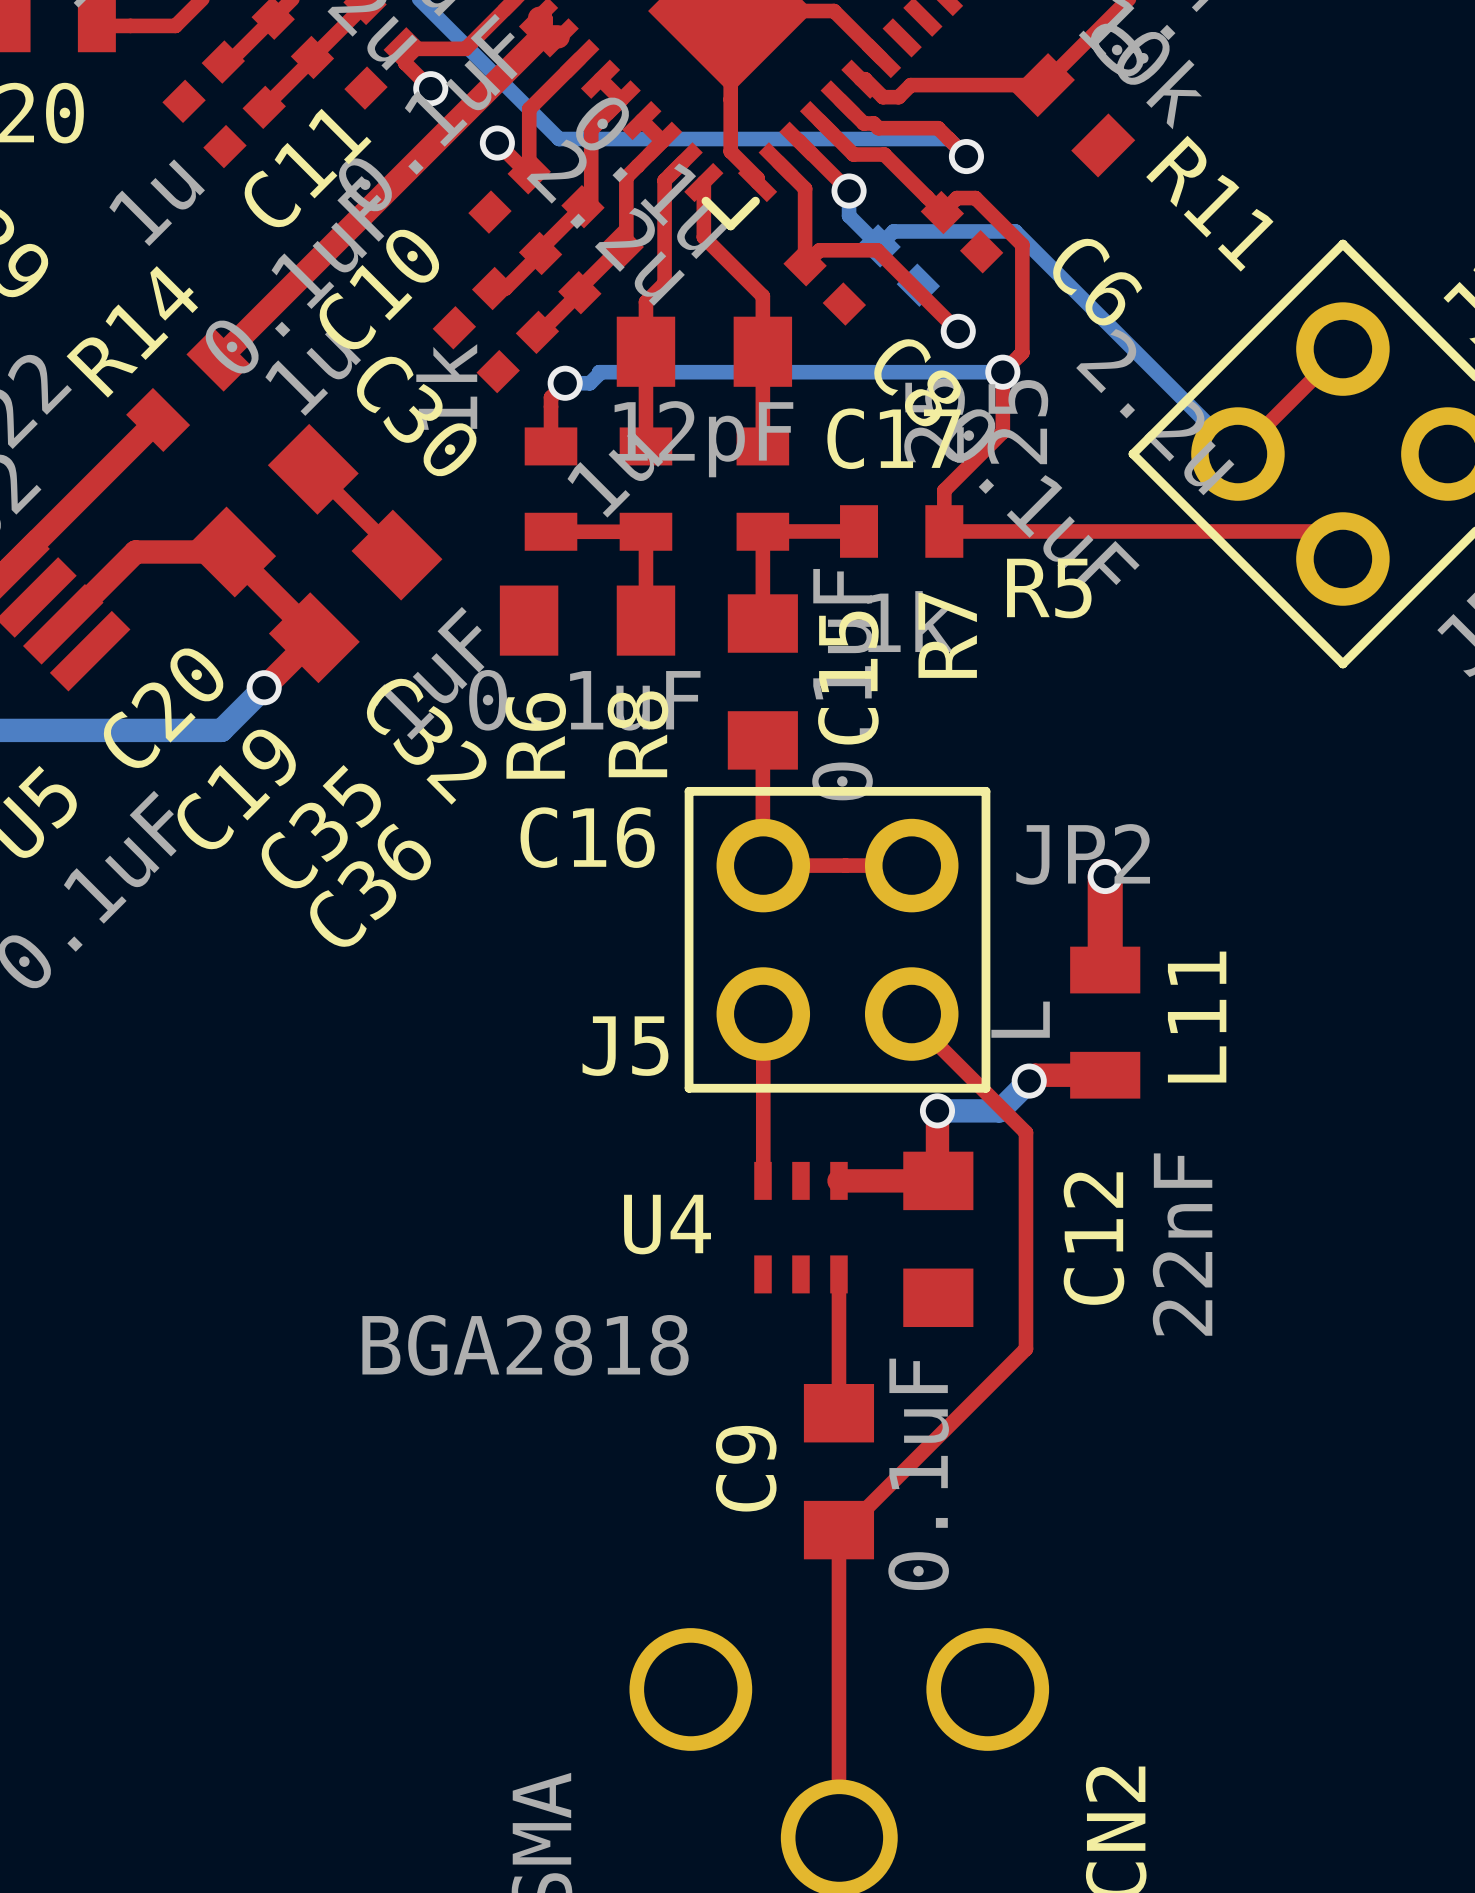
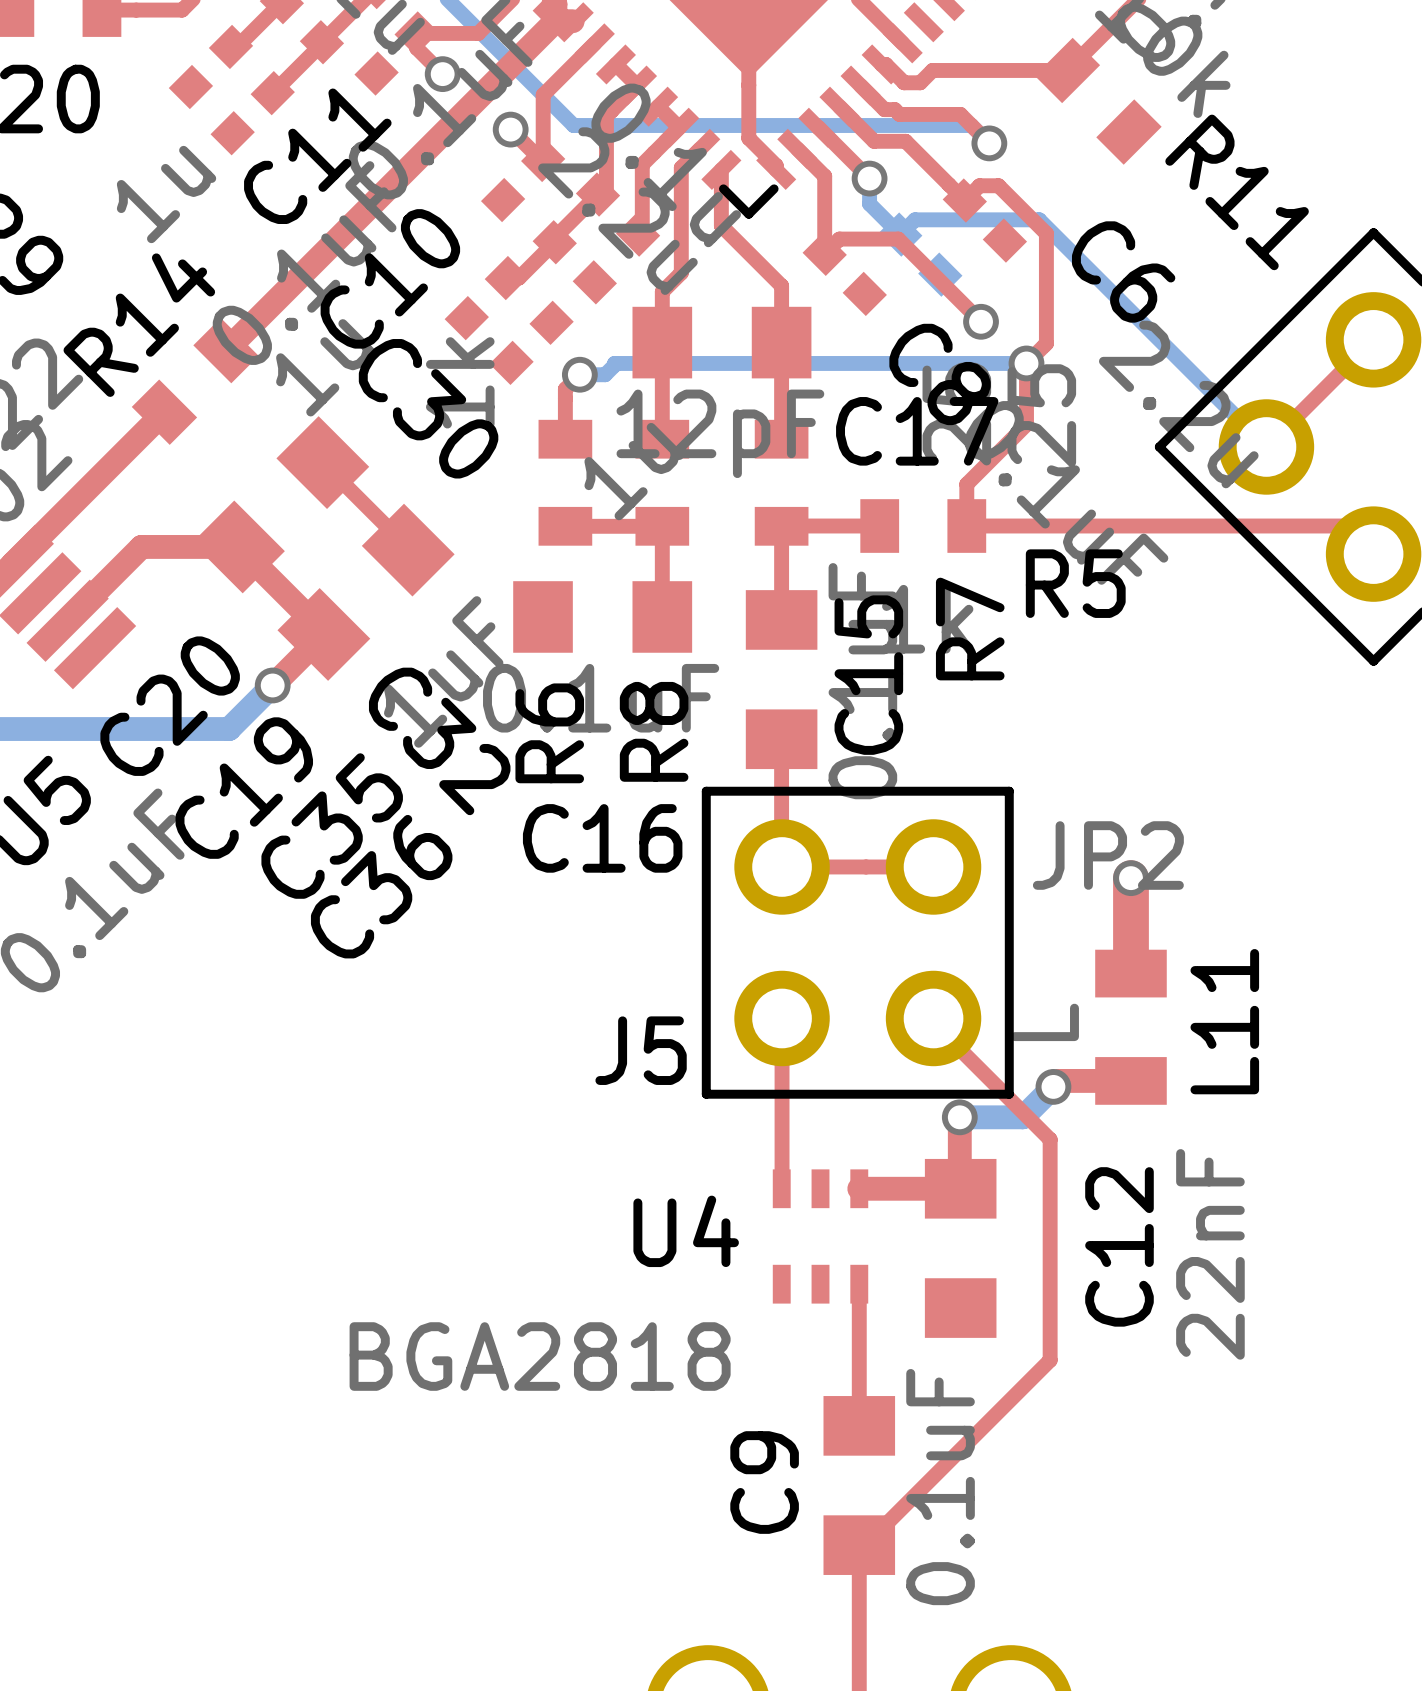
top track: (622, 245) (579, 288) (579, 292) (540, 332) (537, 332) -> none

